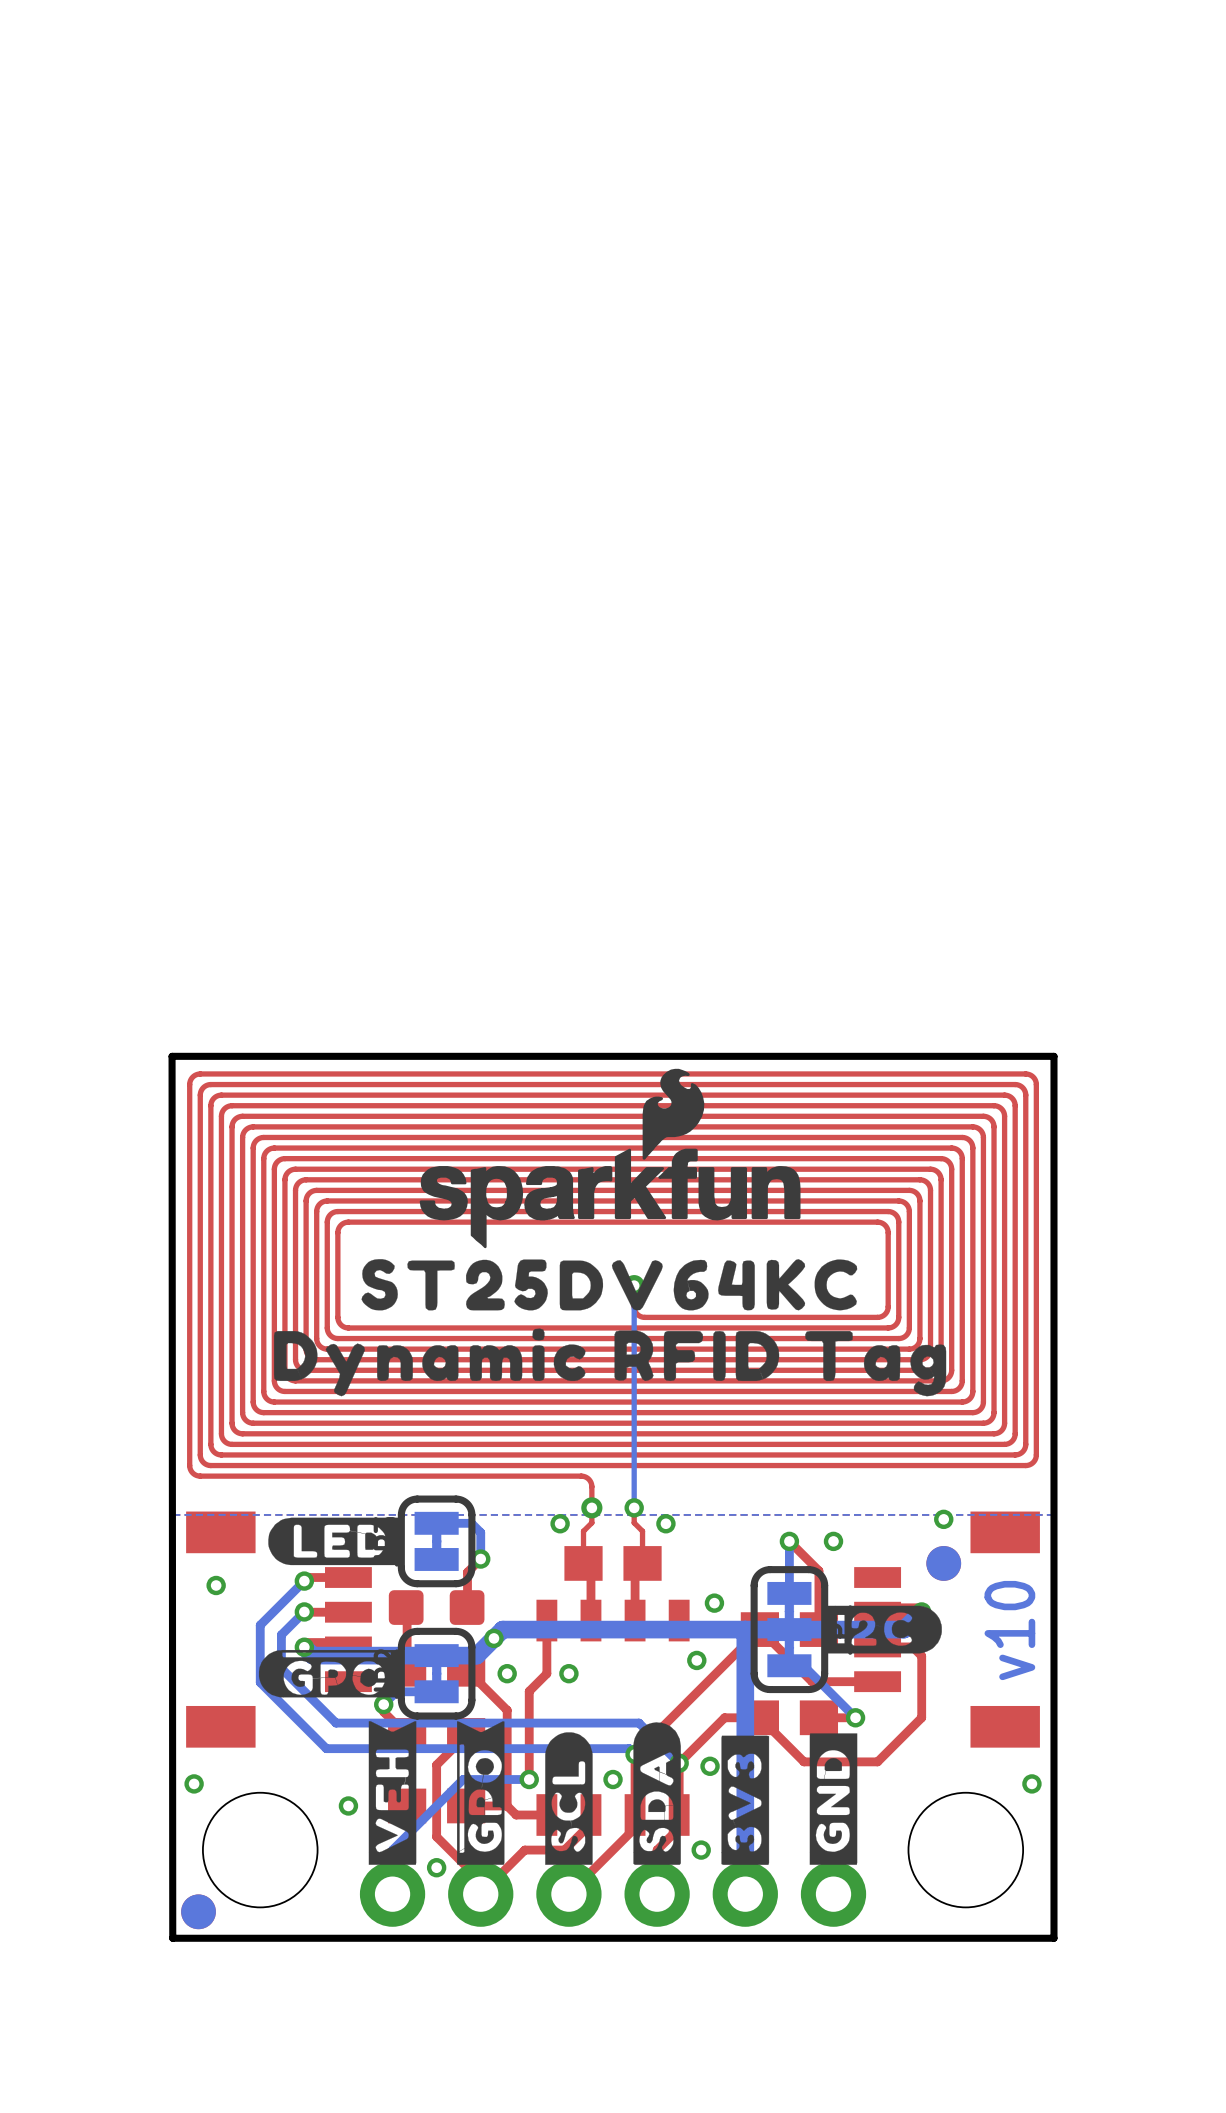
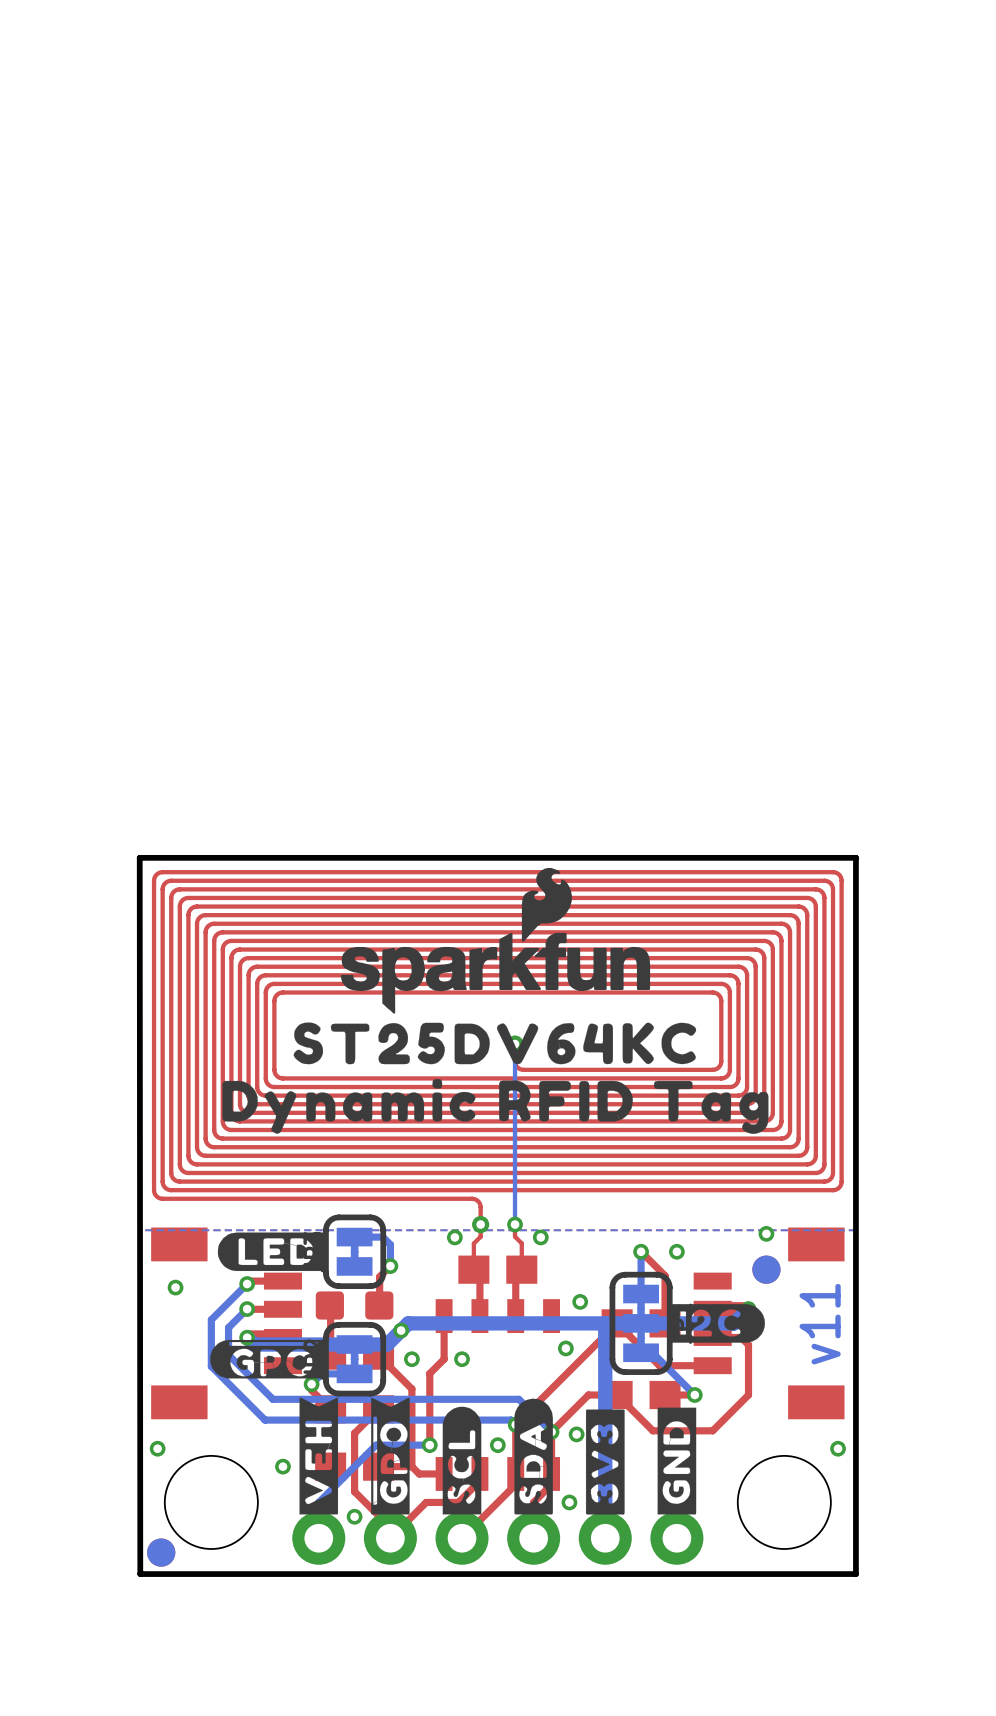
text: v10 (1009, 1630) -> v11 (820, 1324)

